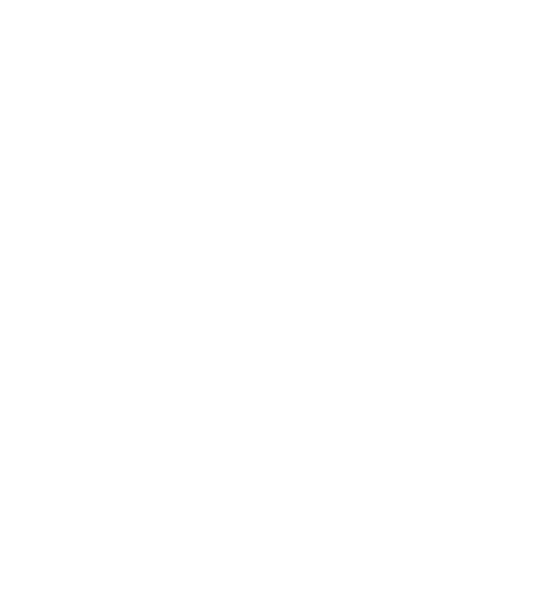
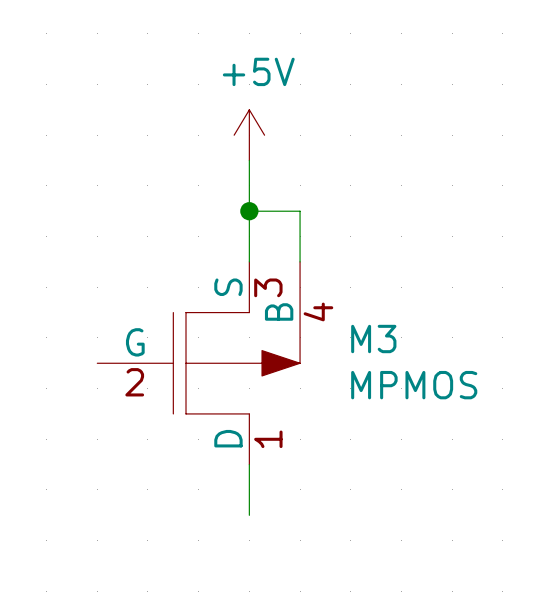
power symbol: none -> +5V (249, 135)
wire: none -> (249, 160) (249, 261)
wire: none -> (249, 211) (300, 211) (300, 261)
junction: none -> (249, 211)
M3: none -> MPMOS (198, 363)
wire: none -> (249, 464) (249, 515)

